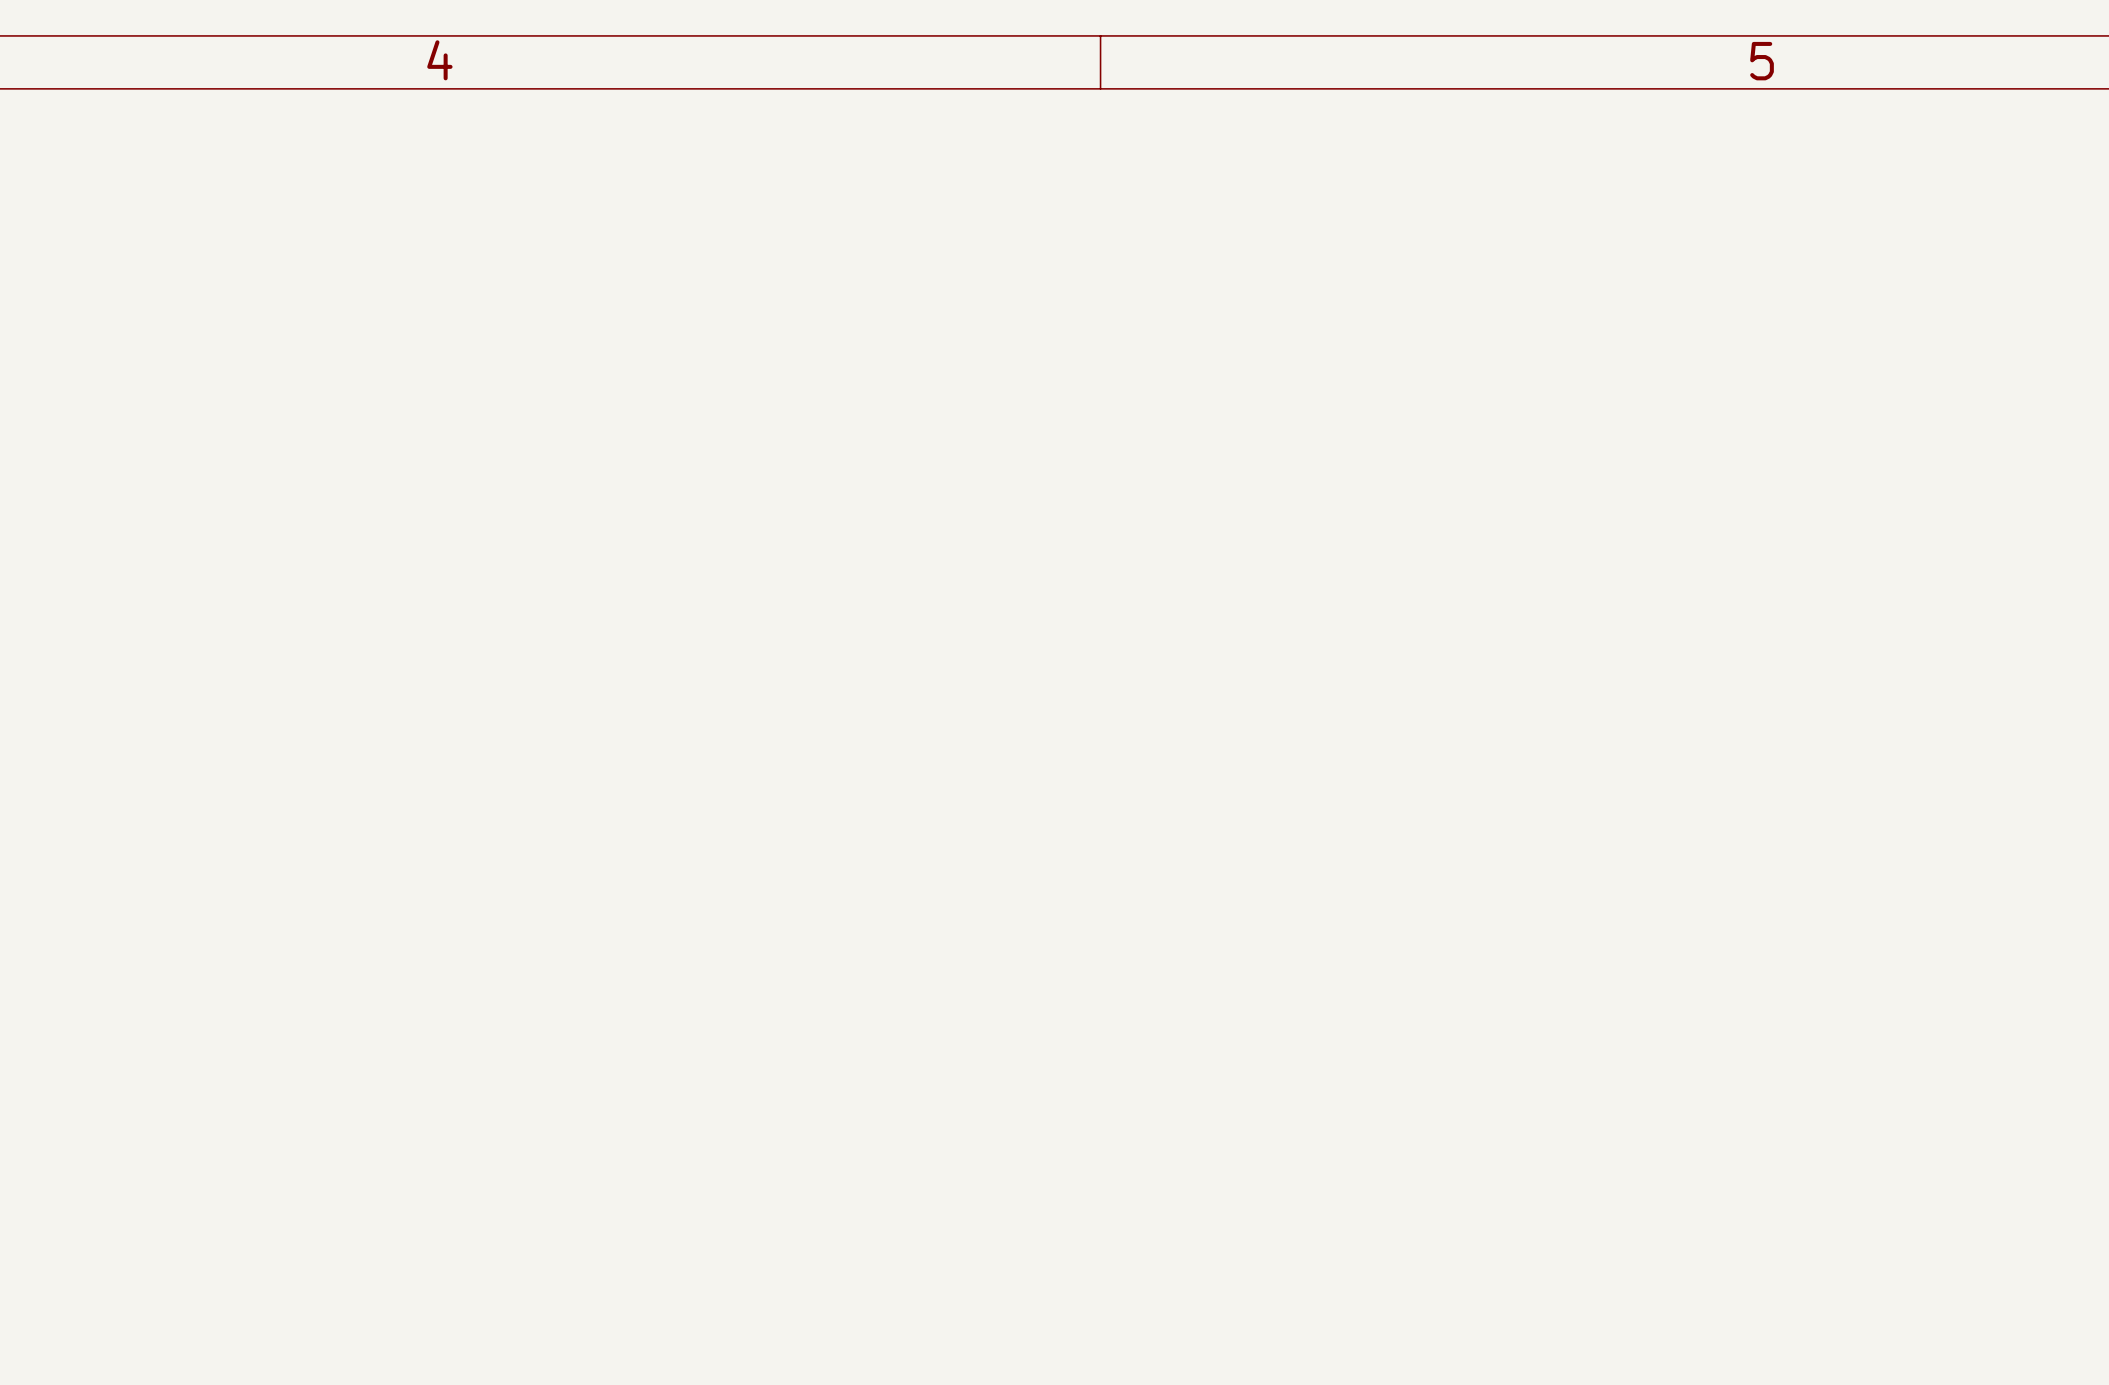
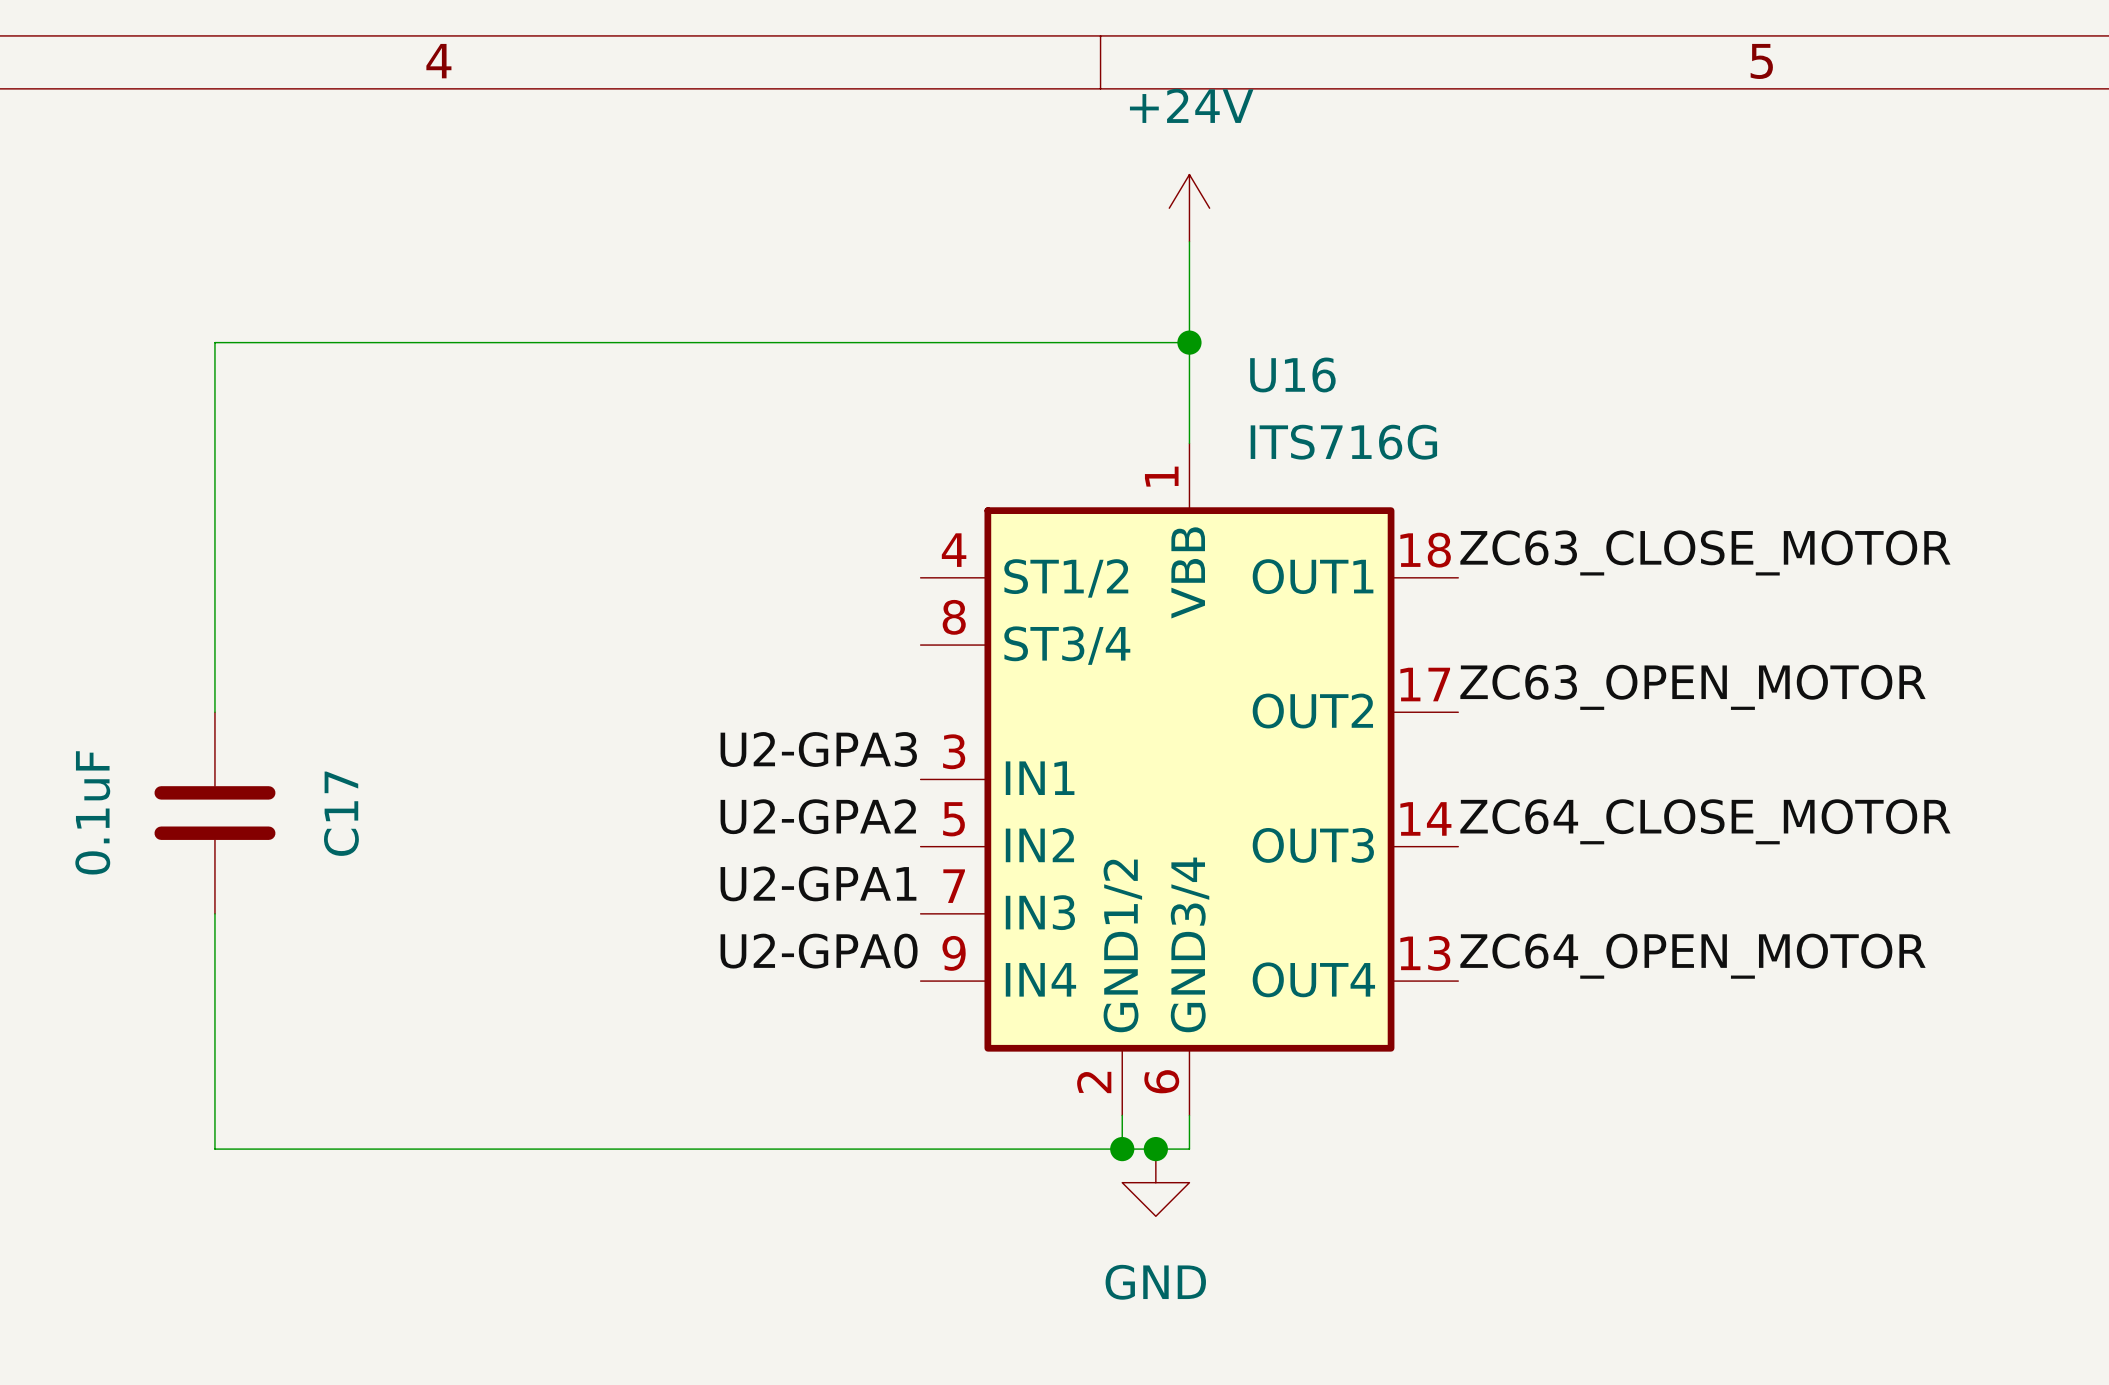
power symbol: none -> +24V (1189, 208)
wire: none -> (1189, 241) (1189, 443)
wire: none -> (1189, 342) (214, 342) (214, 712)
junction: none -> (1189, 342)
label: none -> ZC63_CLOSE_MOTOR (1705, 552)
label: none -> ZC63_OPEN_MOTOR (1692, 687)
label: none -> U2-GPA3 (818, 749)
U16: none -> ITS716G (1189, 779)
C17: none -> 0.1uF (214, 813)
label: none -> U2-GPA2 (818, 816)
label: none -> ZC64_CLOSE_MOTOR (1705, 821)
label: none -> U2-GPA1 (818, 883)
wire: none -> (214, 913) (214, 1149) (1189, 1149) (1189, 1115)
label: none -> U2-GPA0 (819, 951)
label: none -> ZC64_OPEN_MOTOR (1692, 956)
wire: none -> (1122, 1115) (1122, 1149)
junction: none -> (1122, 1149)
junction: none -> (1155, 1149)
power symbol: none -> GND (1155, 1182)

